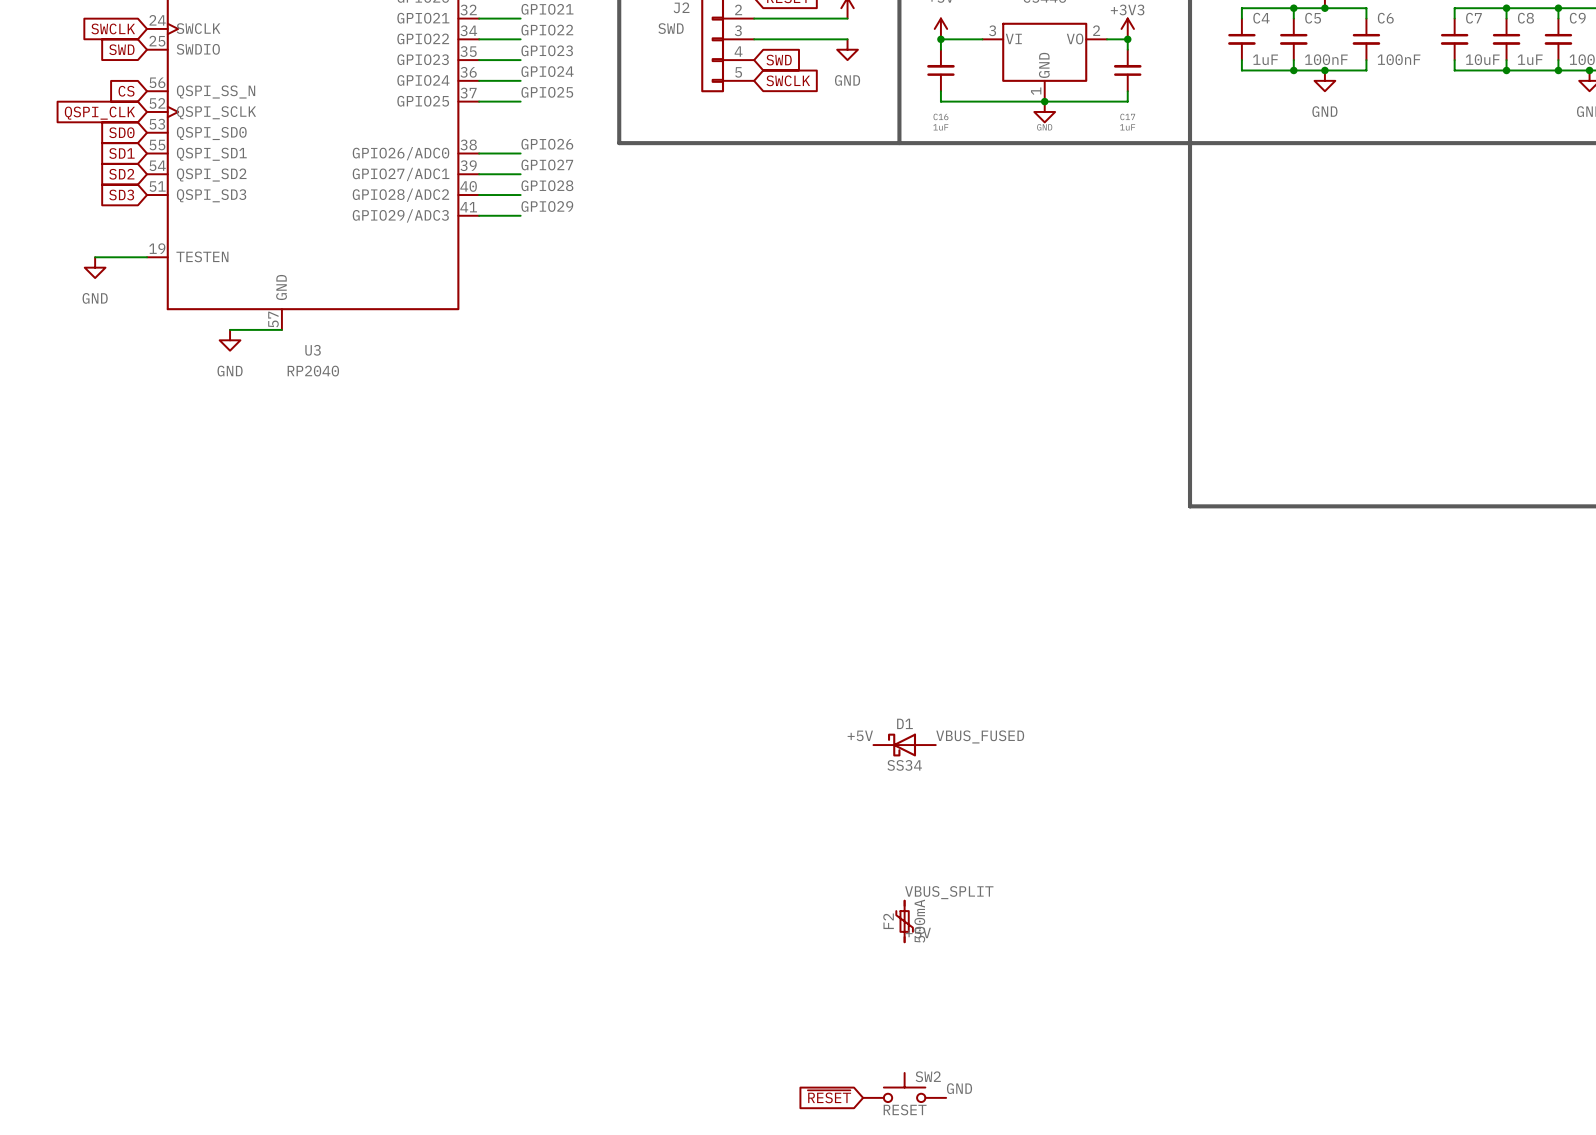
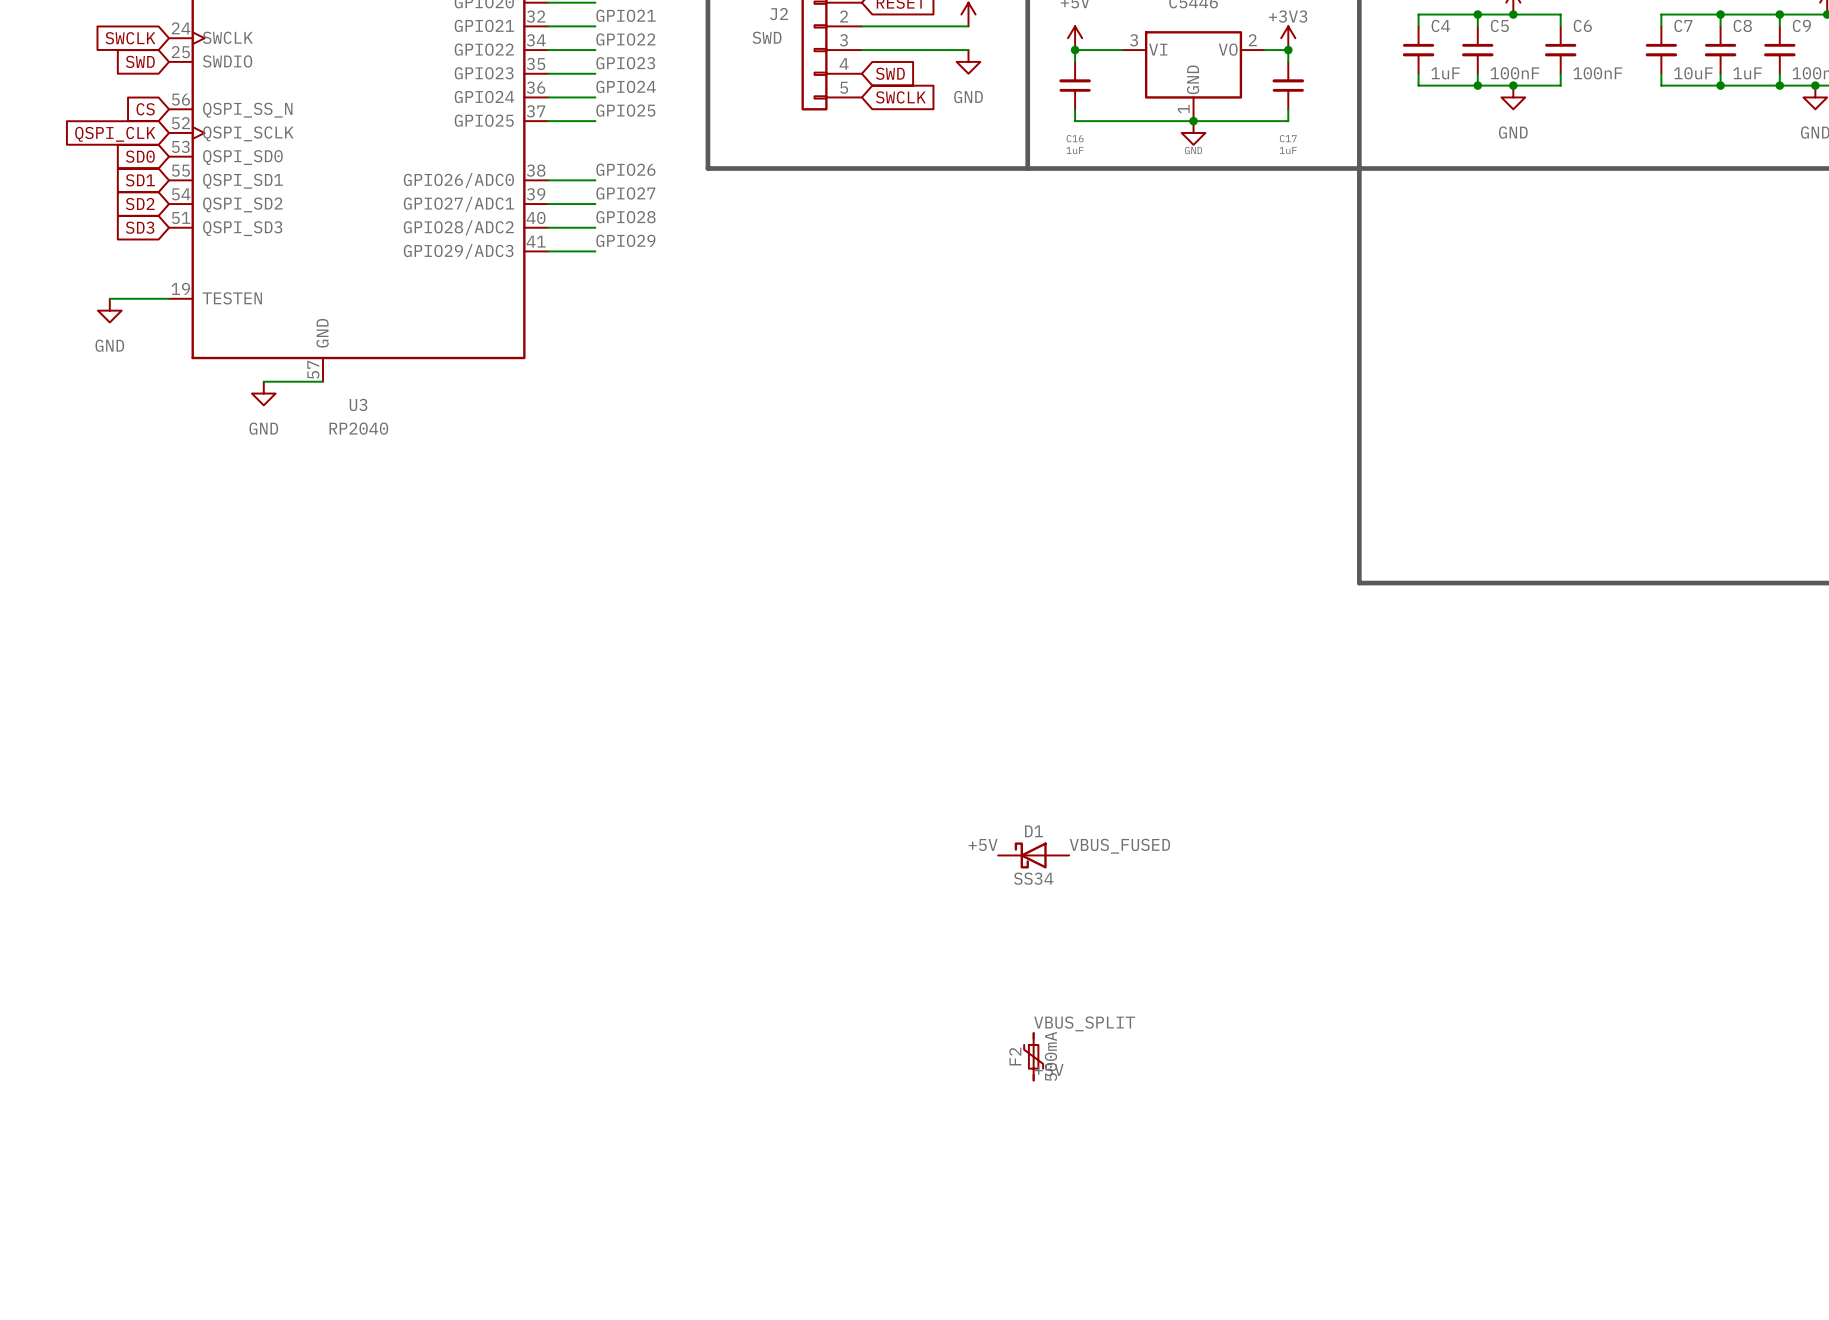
SW2: RESET (904, 1087) -> none
label: GND (959, 1088) -> none
global label: ~{RESET} (829, 1096) -> none

